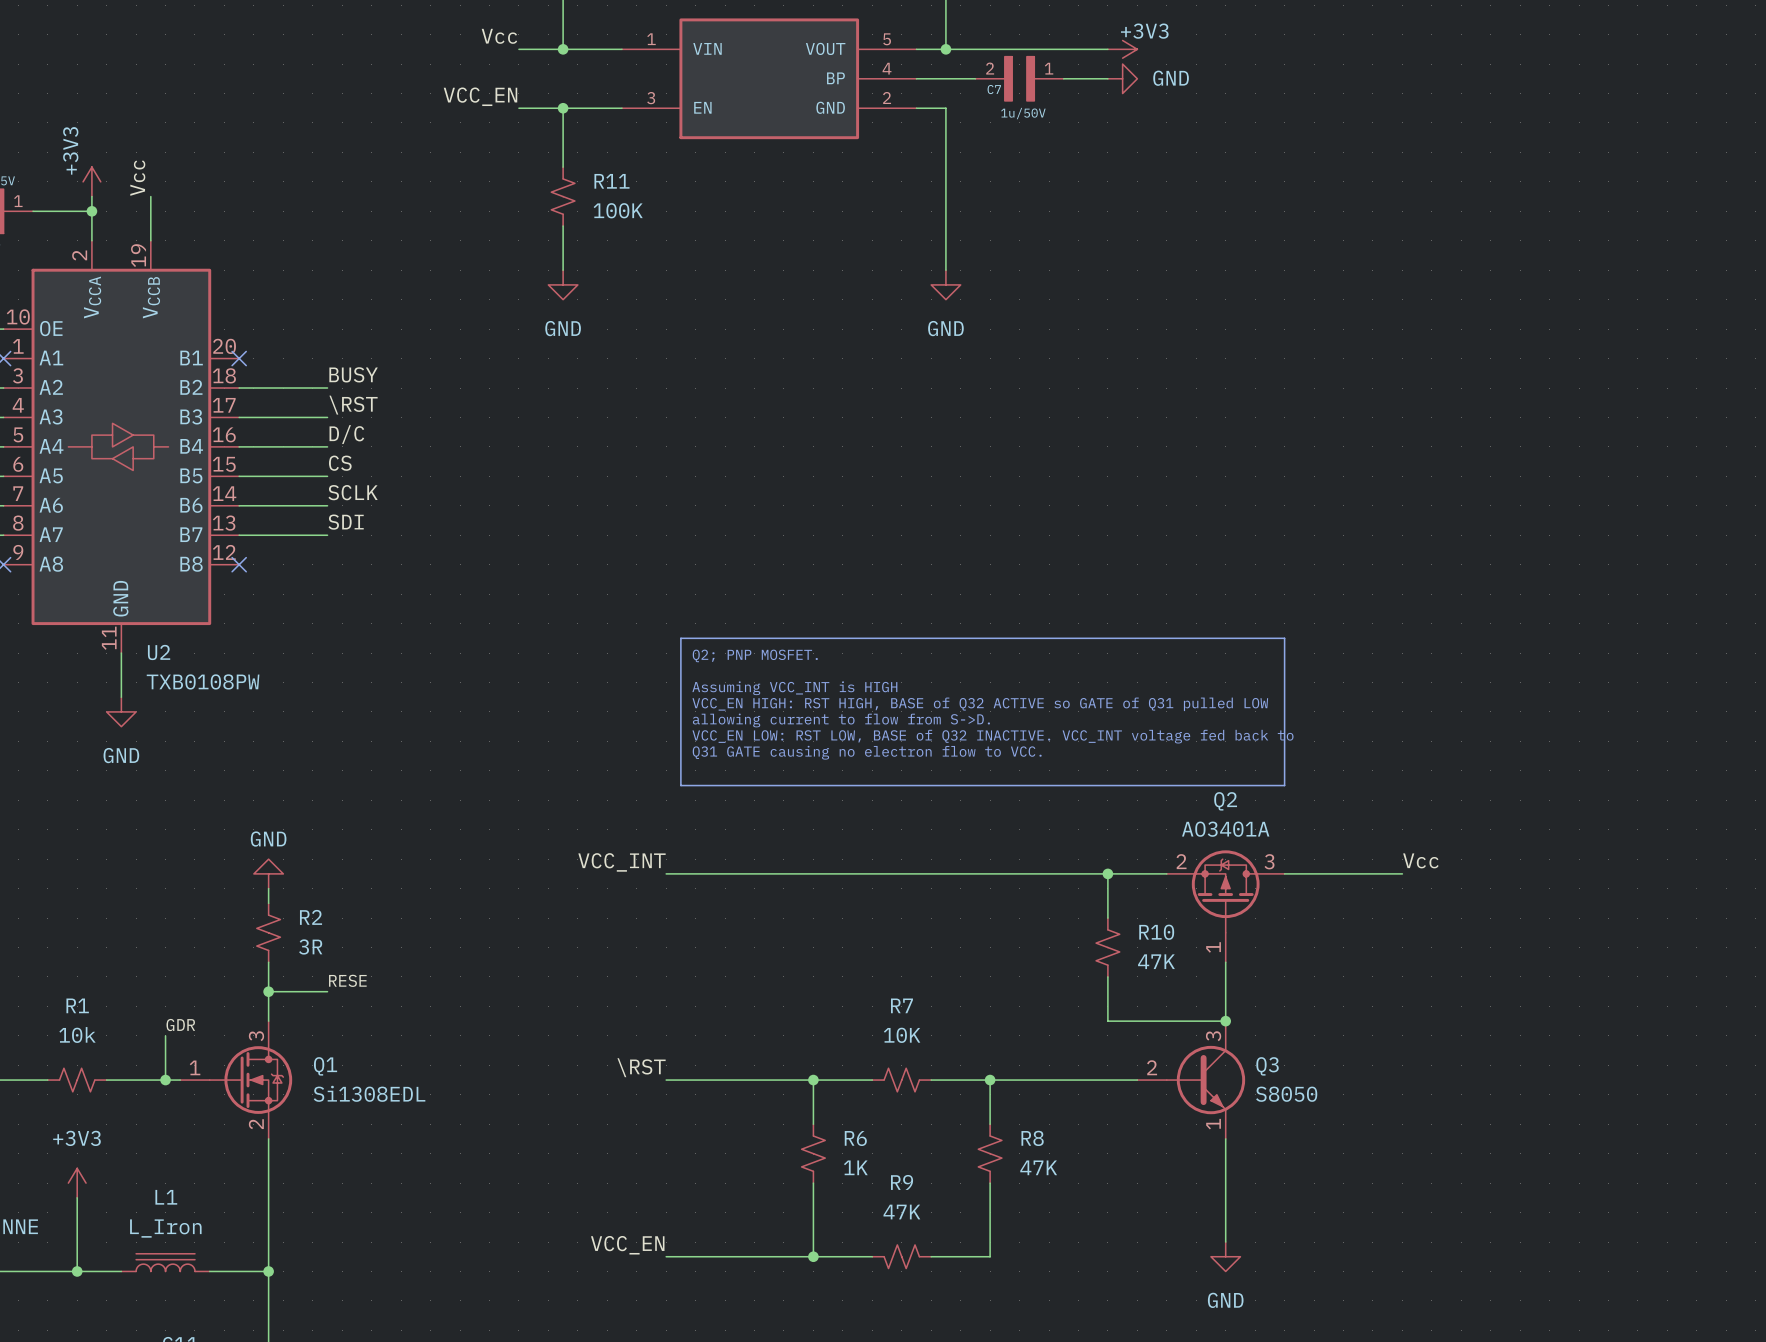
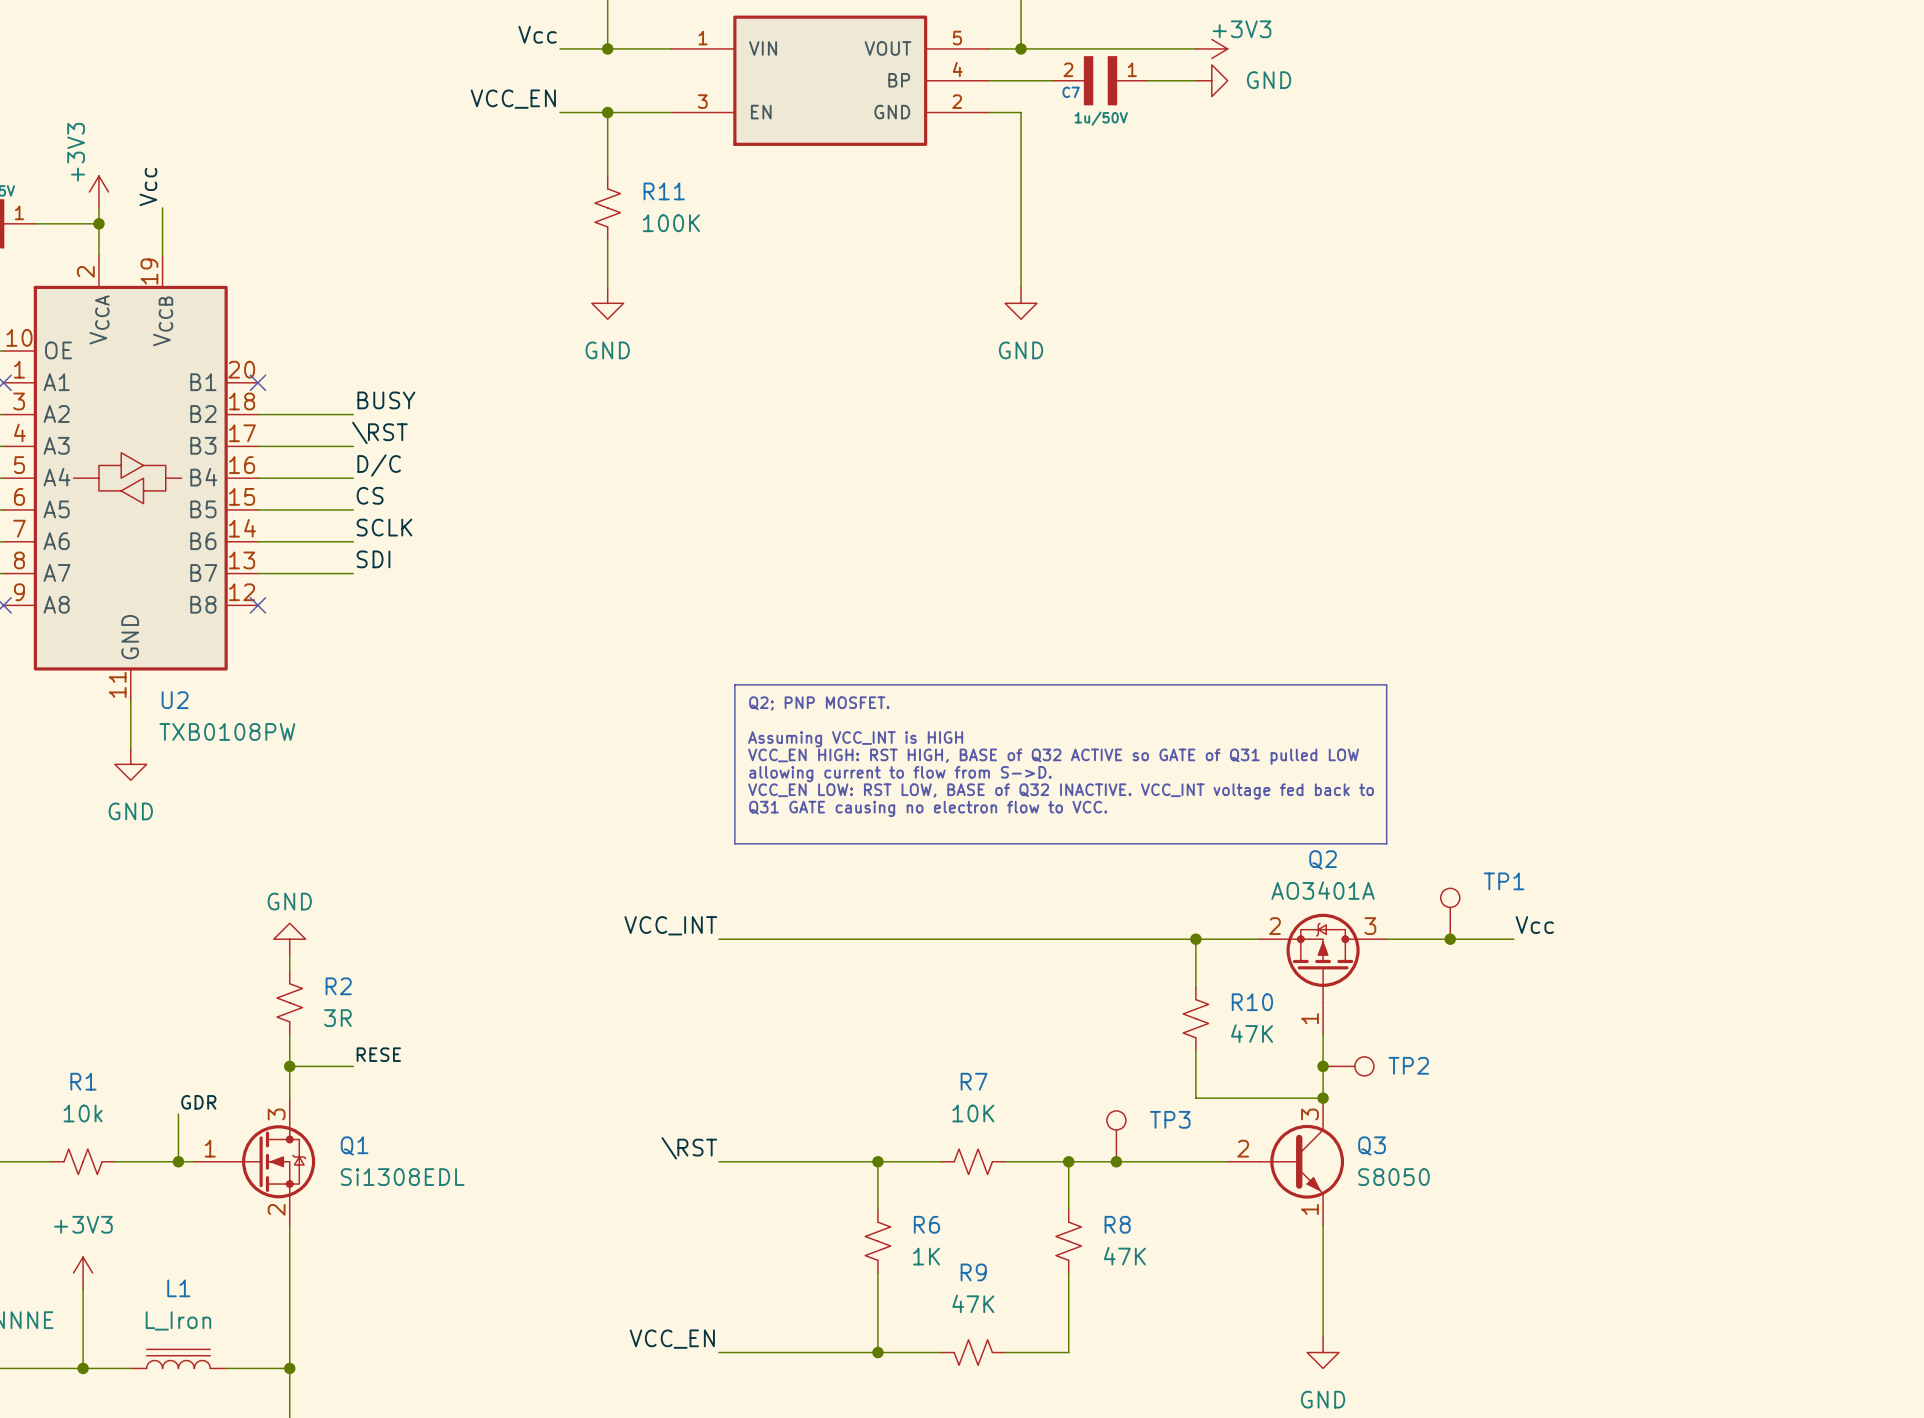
TP1: none -> (1450, 913)
junction: none -> (1450, 939)
junction: none -> (1323, 1066)
TP2: none -> (1348, 1066)
TP3: none -> (1116, 1136)
junction: none -> (1116, 1161)

